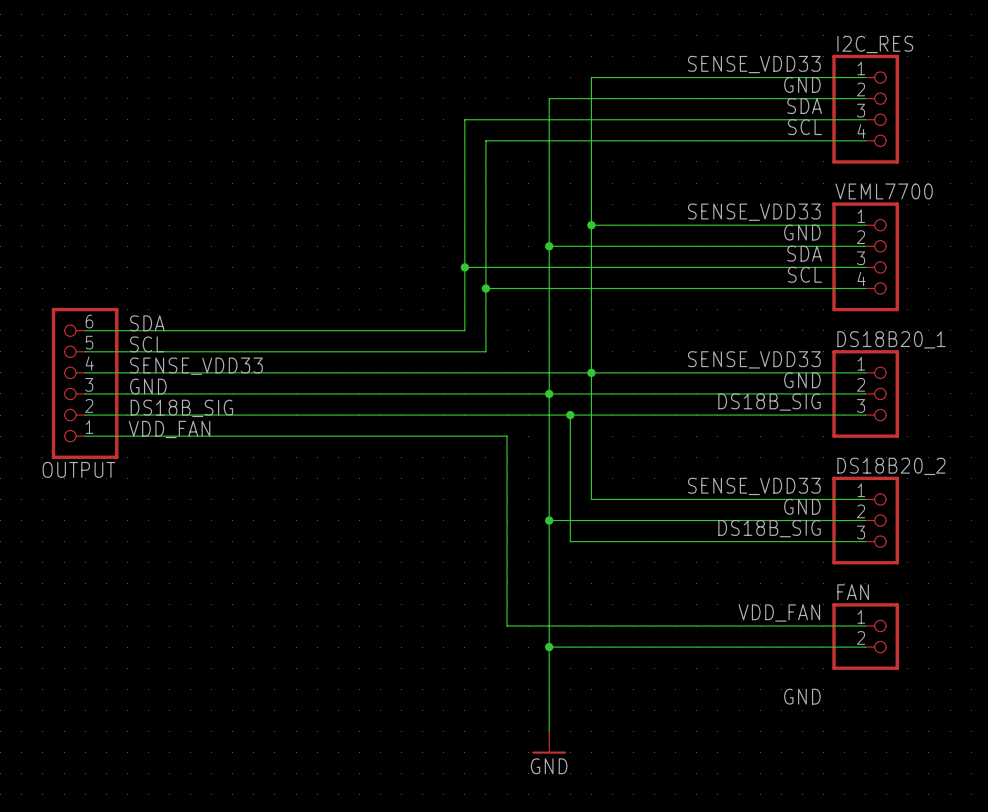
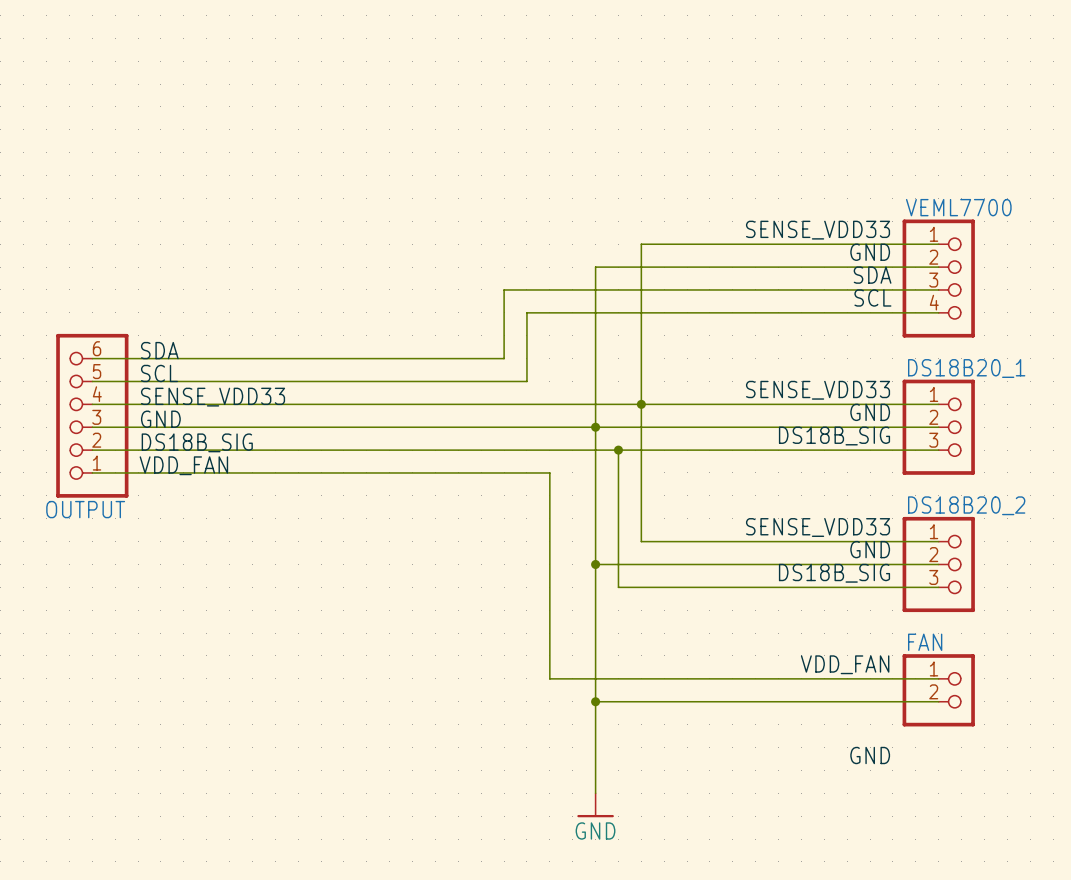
label: SENSE_VDD33 (754, 64) -> none
wire: (865, 77) (591, 77) (591, 225) -> none
label: GND (802, 84) -> none
wire: (865, 98) (549, 98) (549, 246) -> none
label: SDA (804, 106) -> none
I2C_RES: (865, 109) -> none
wire: (865, 119) (464, 119) (464, 267) -> none
label: SCL (804, 127) -> none
wire: (865, 140) (485, 140) (485, 288) -> none
junction: (591, 225) -> none
junction: (549, 246) -> none
junction: (464, 267) -> none
junction: (485, 288) -> none

